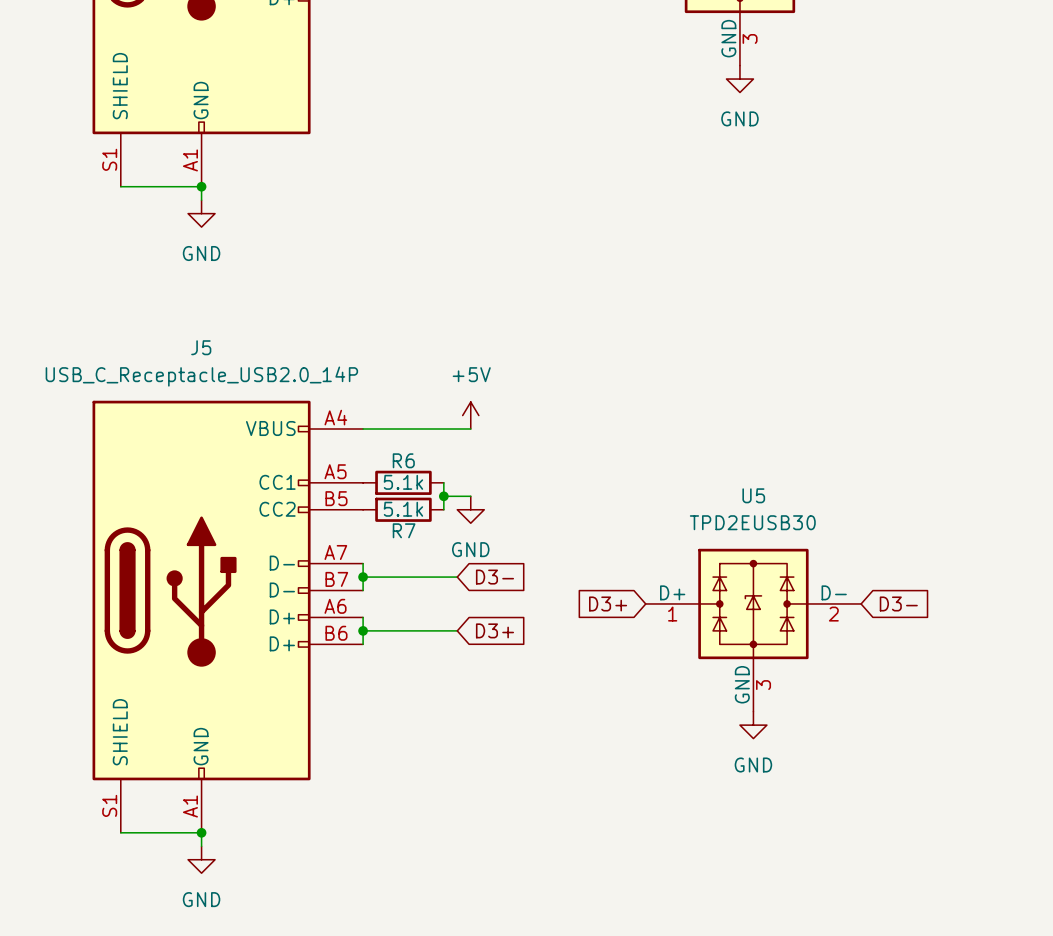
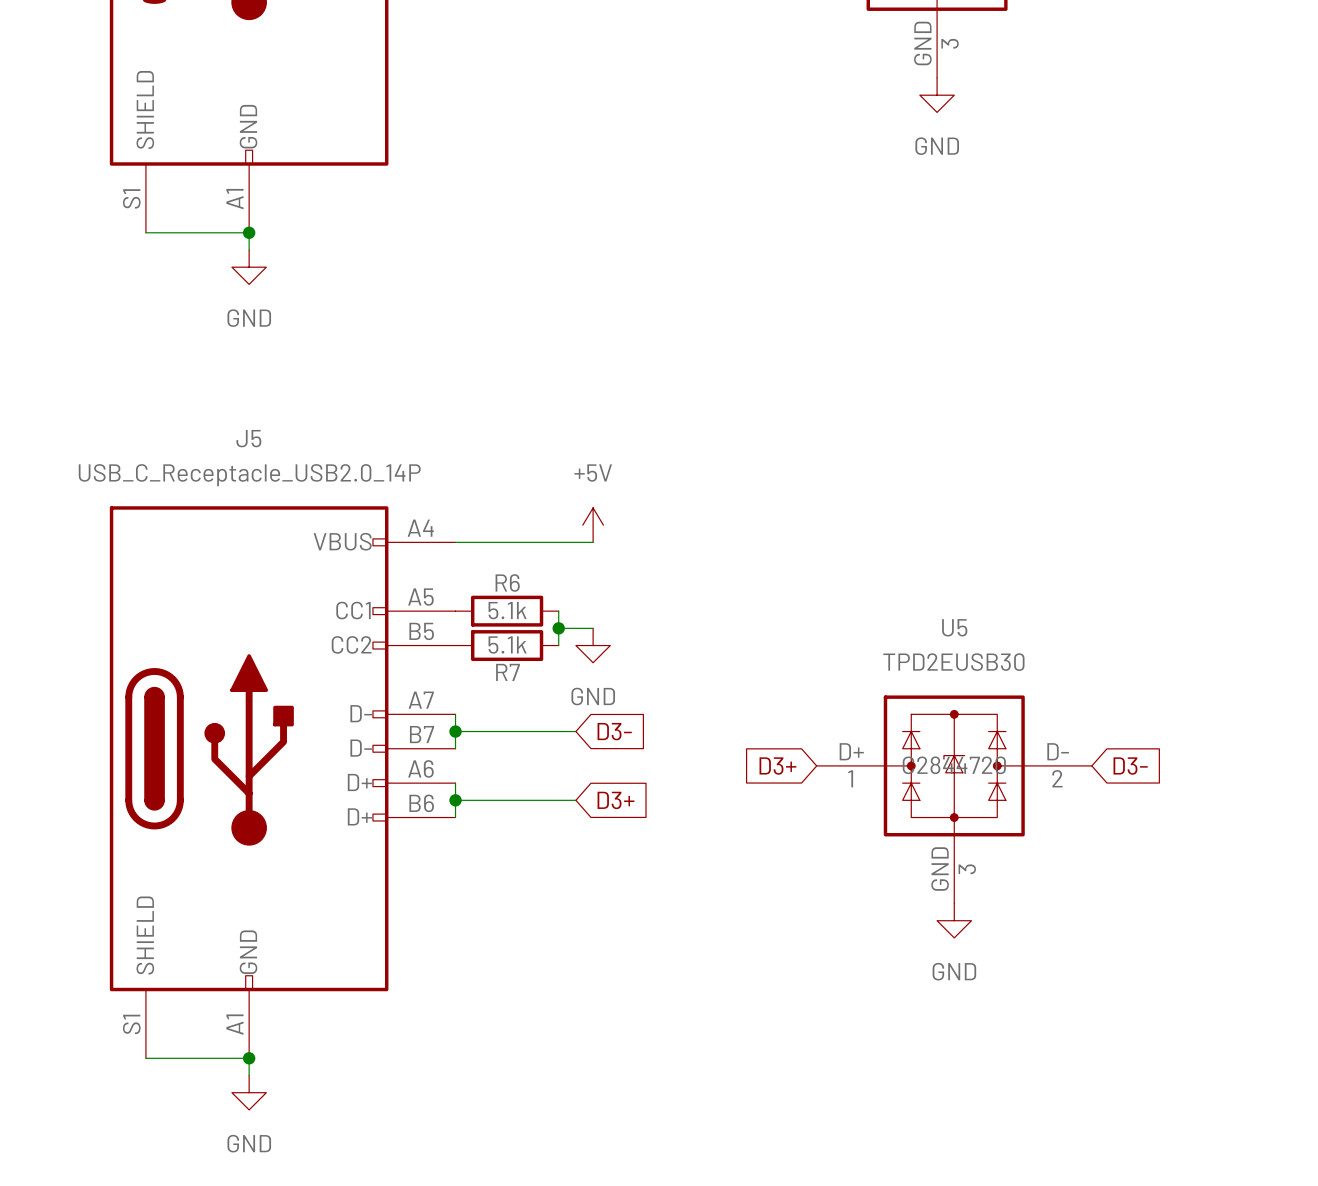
U5 text: none -> C2844720 (954, 765)

